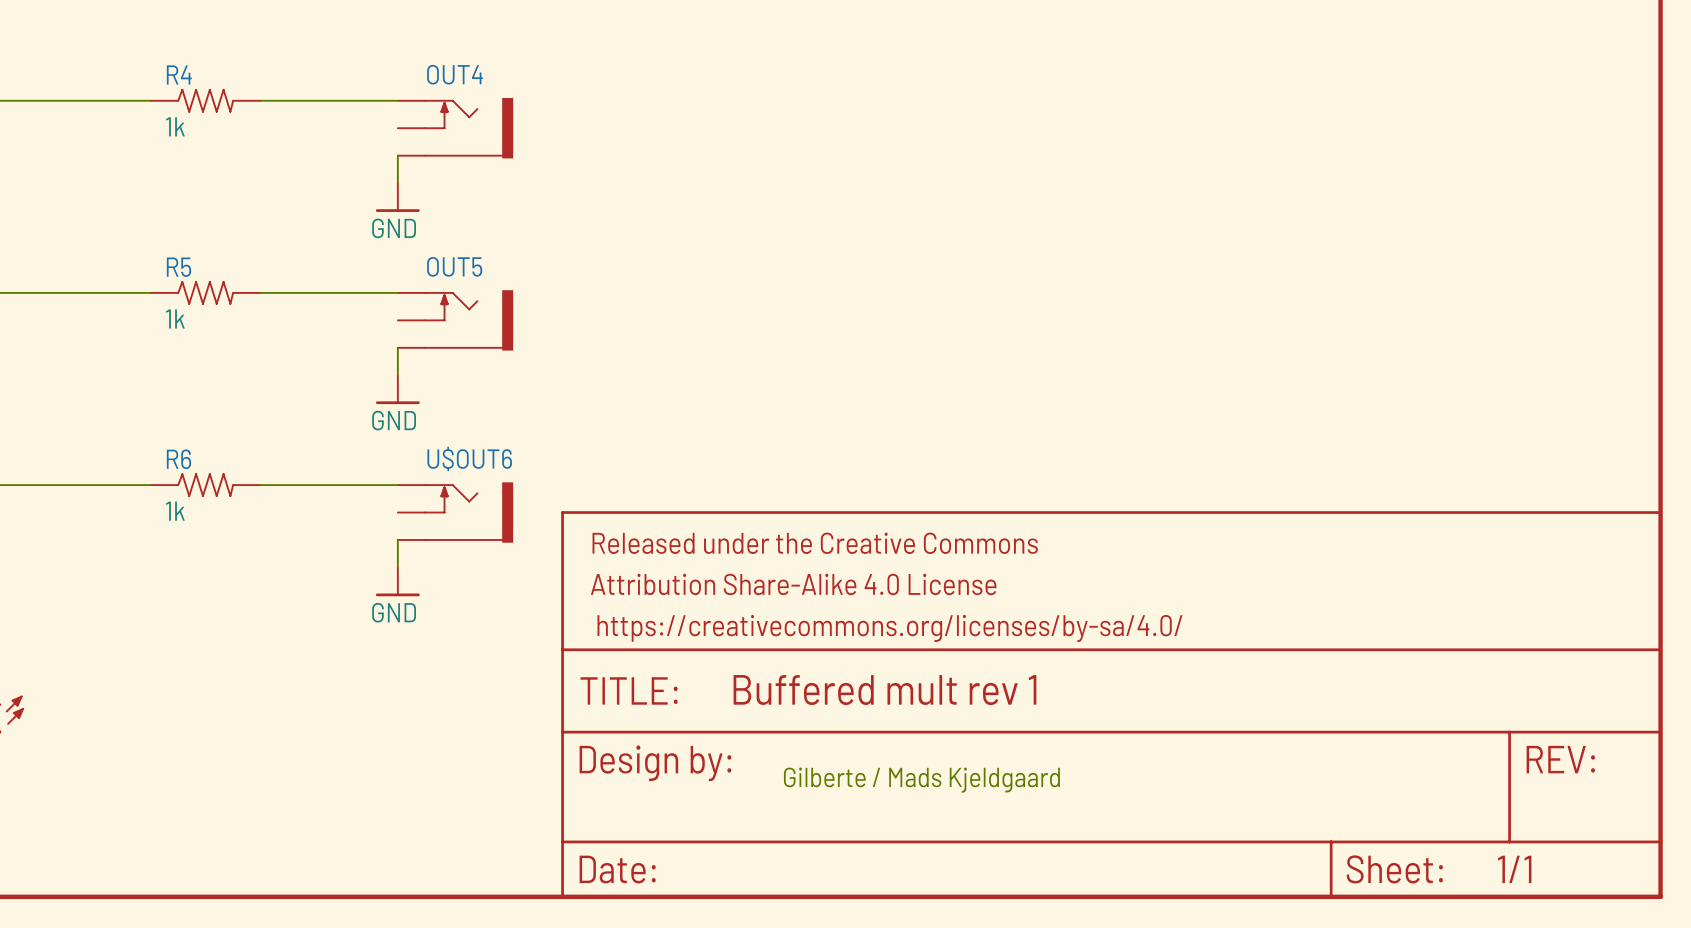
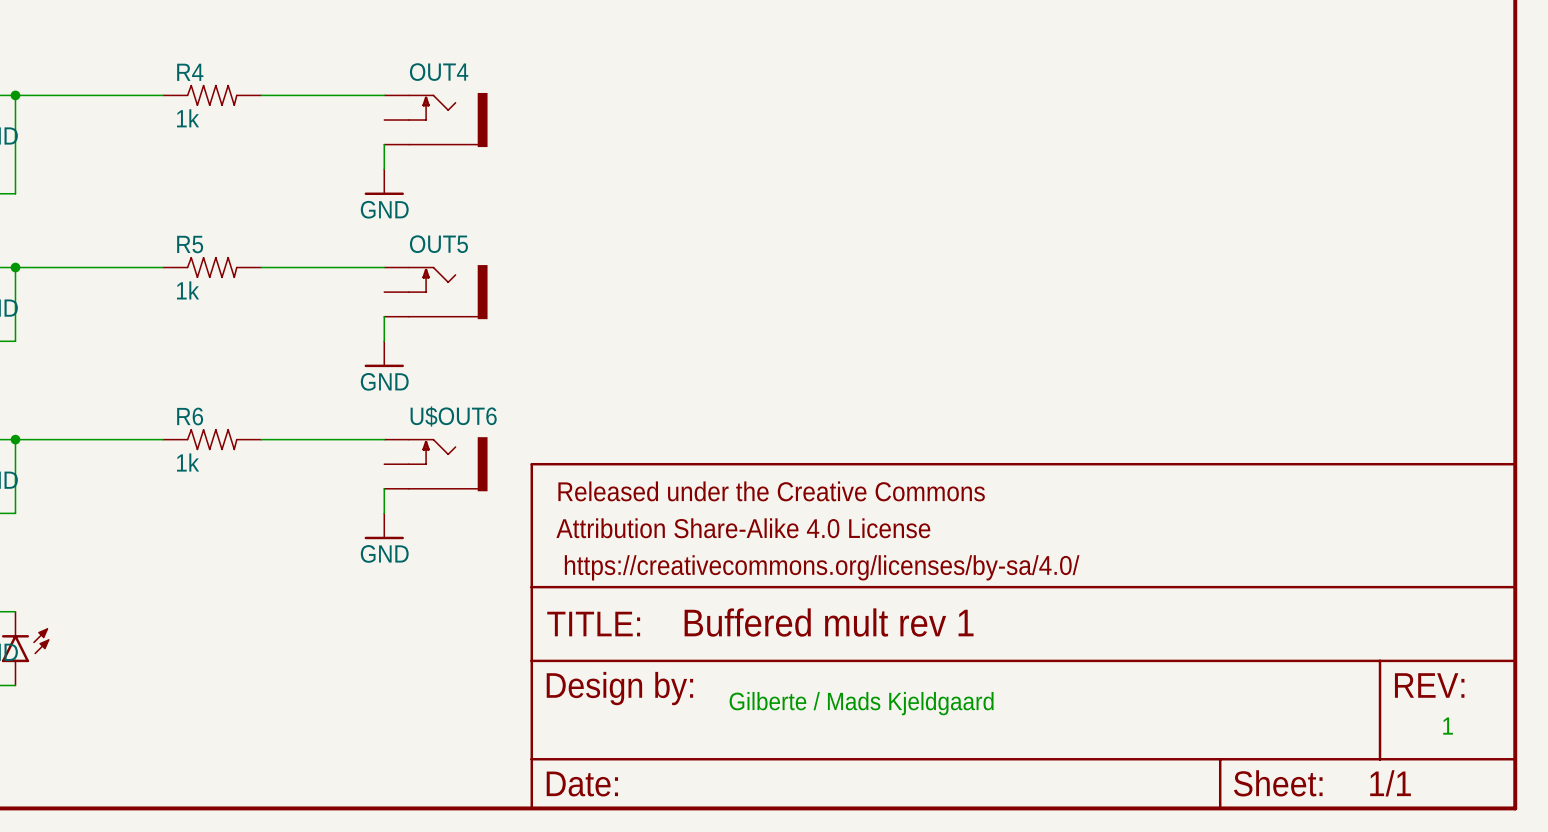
text: none -> 1 (1448, 726)

